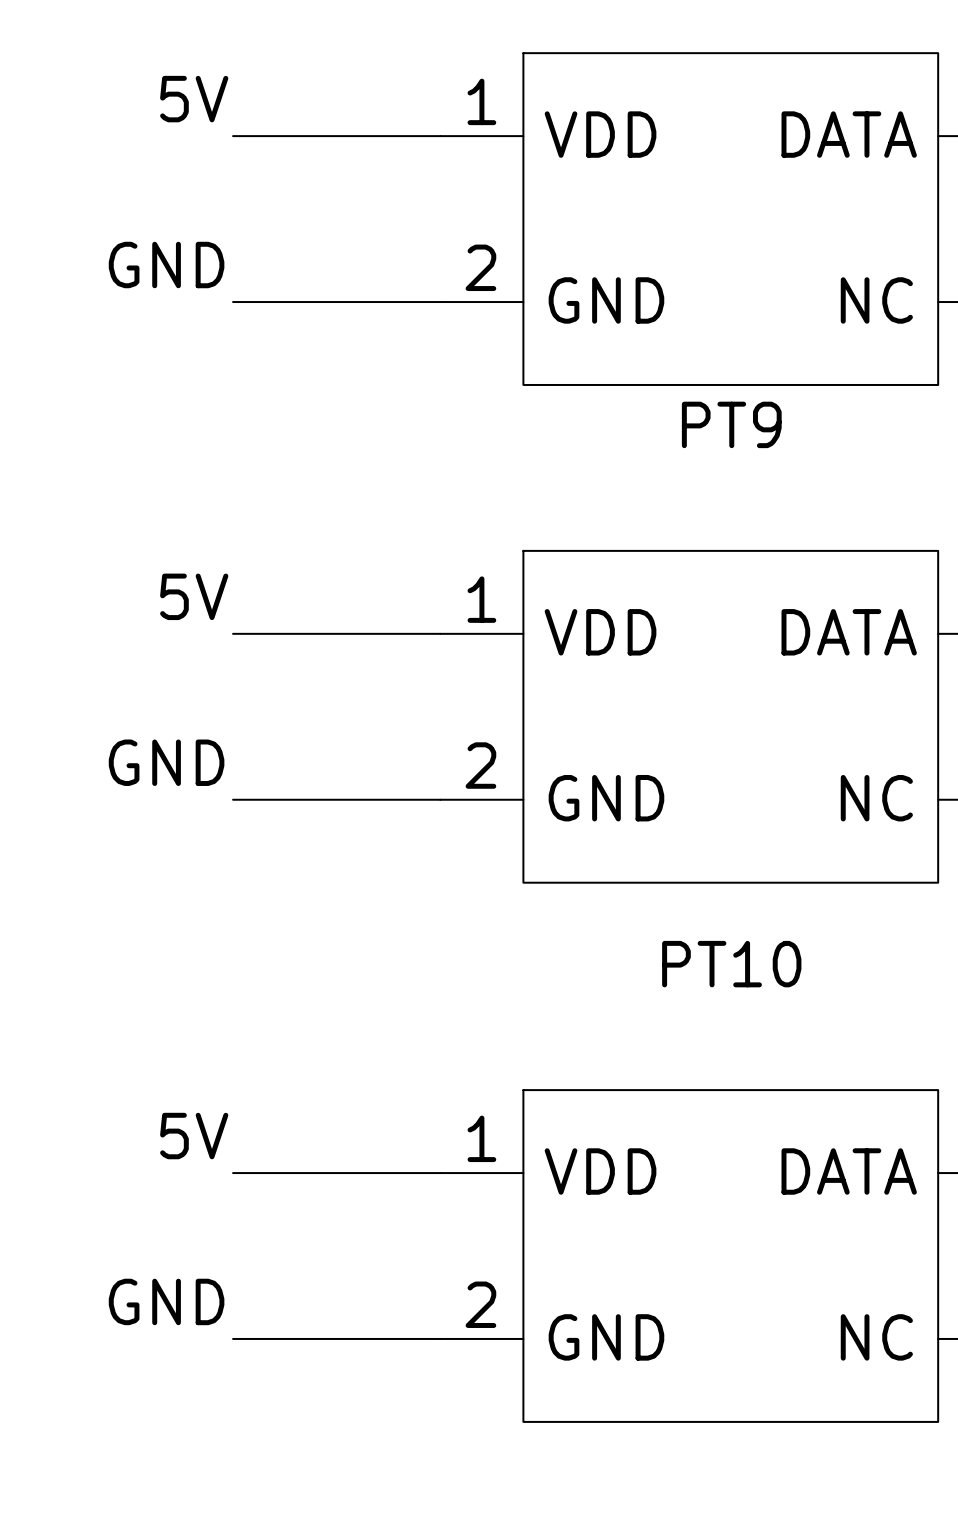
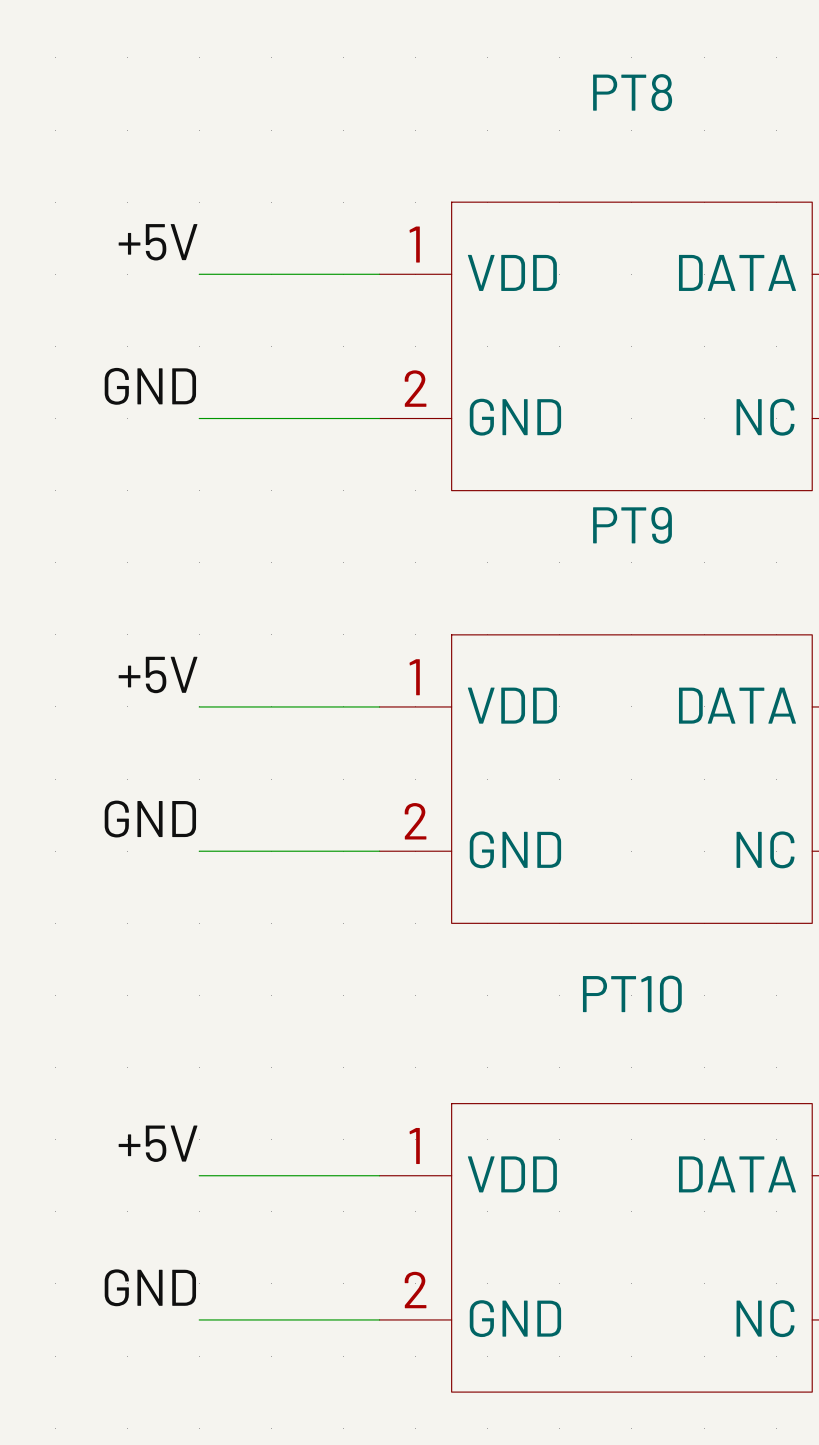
label: 5V (194, 99) -> +5V (158, 242)
label: 5V (194, 596) -> +5V (158, 674)
label: 5V (194, 1136) -> +5V (158, 1143)

